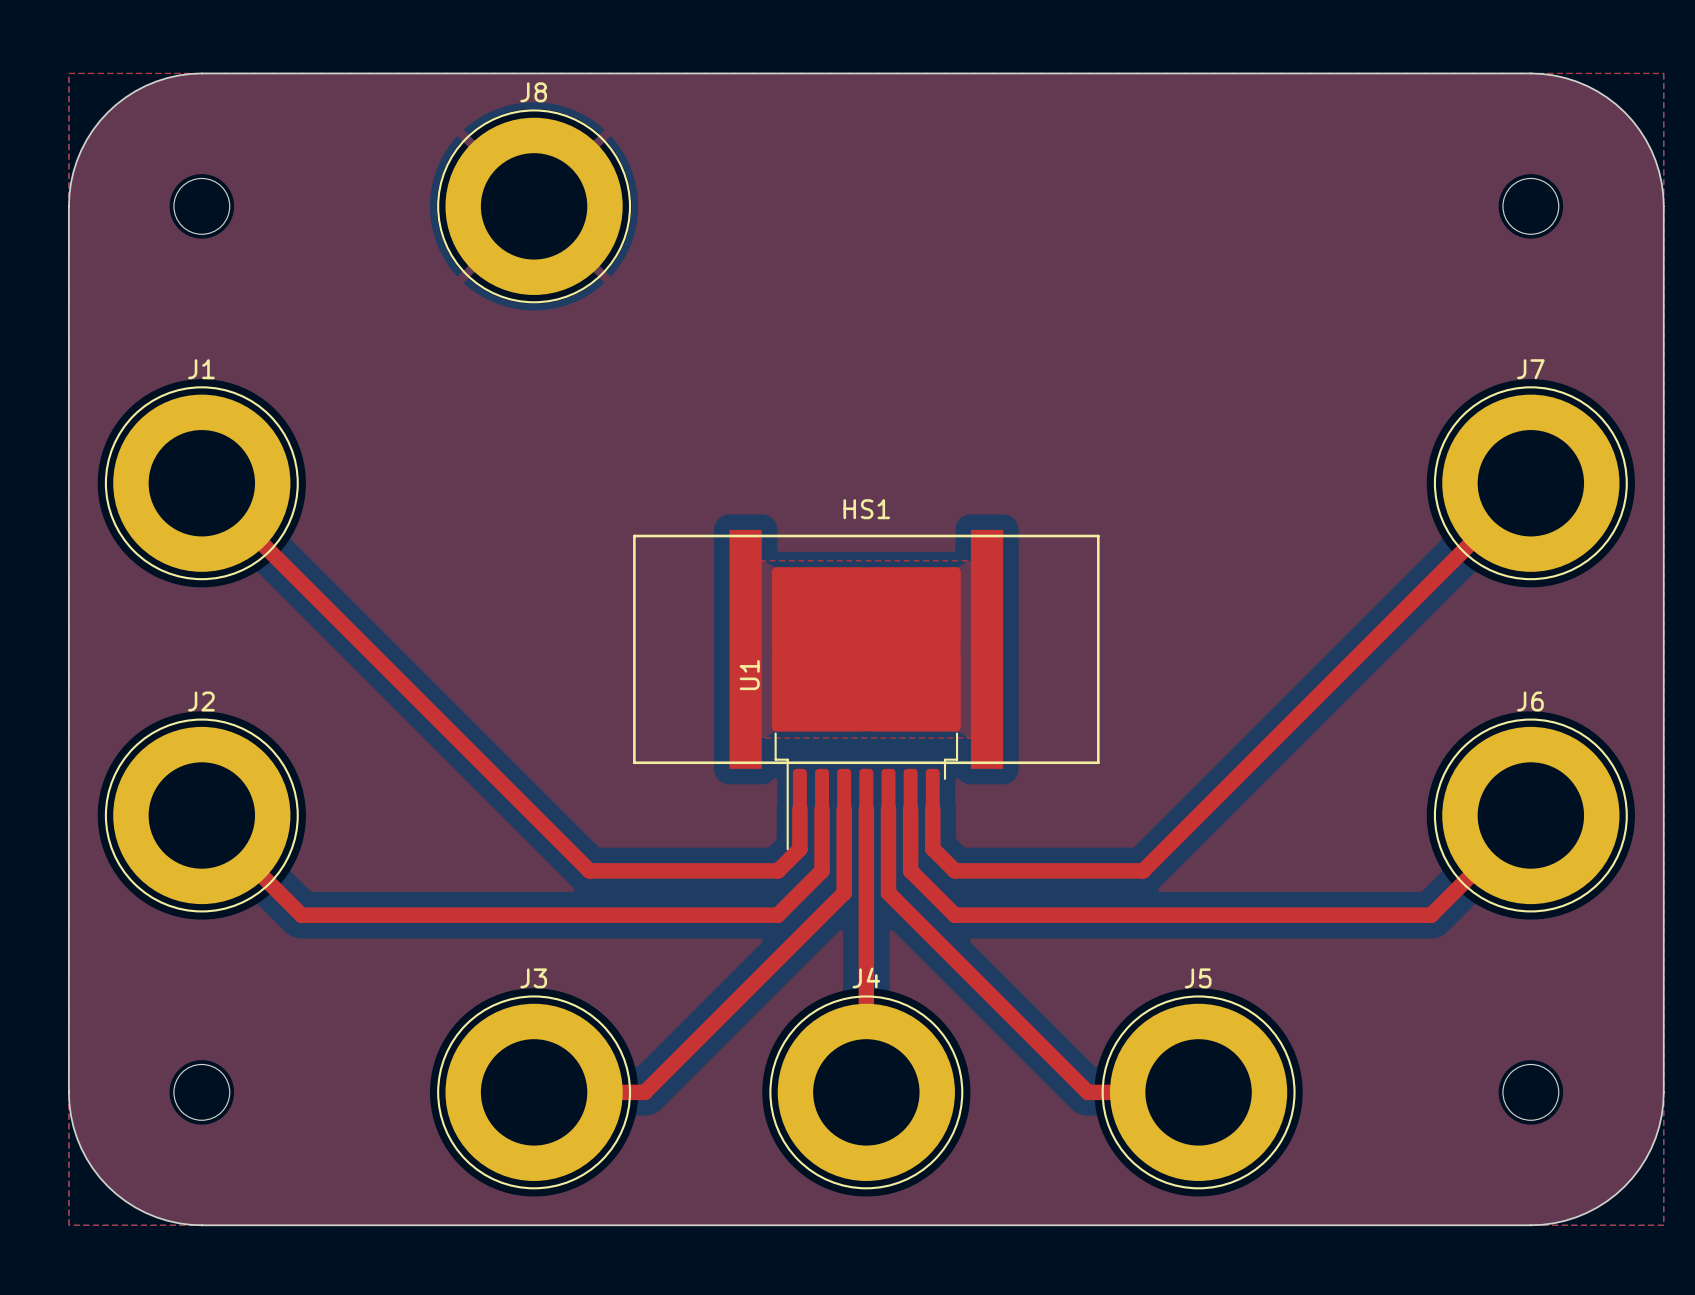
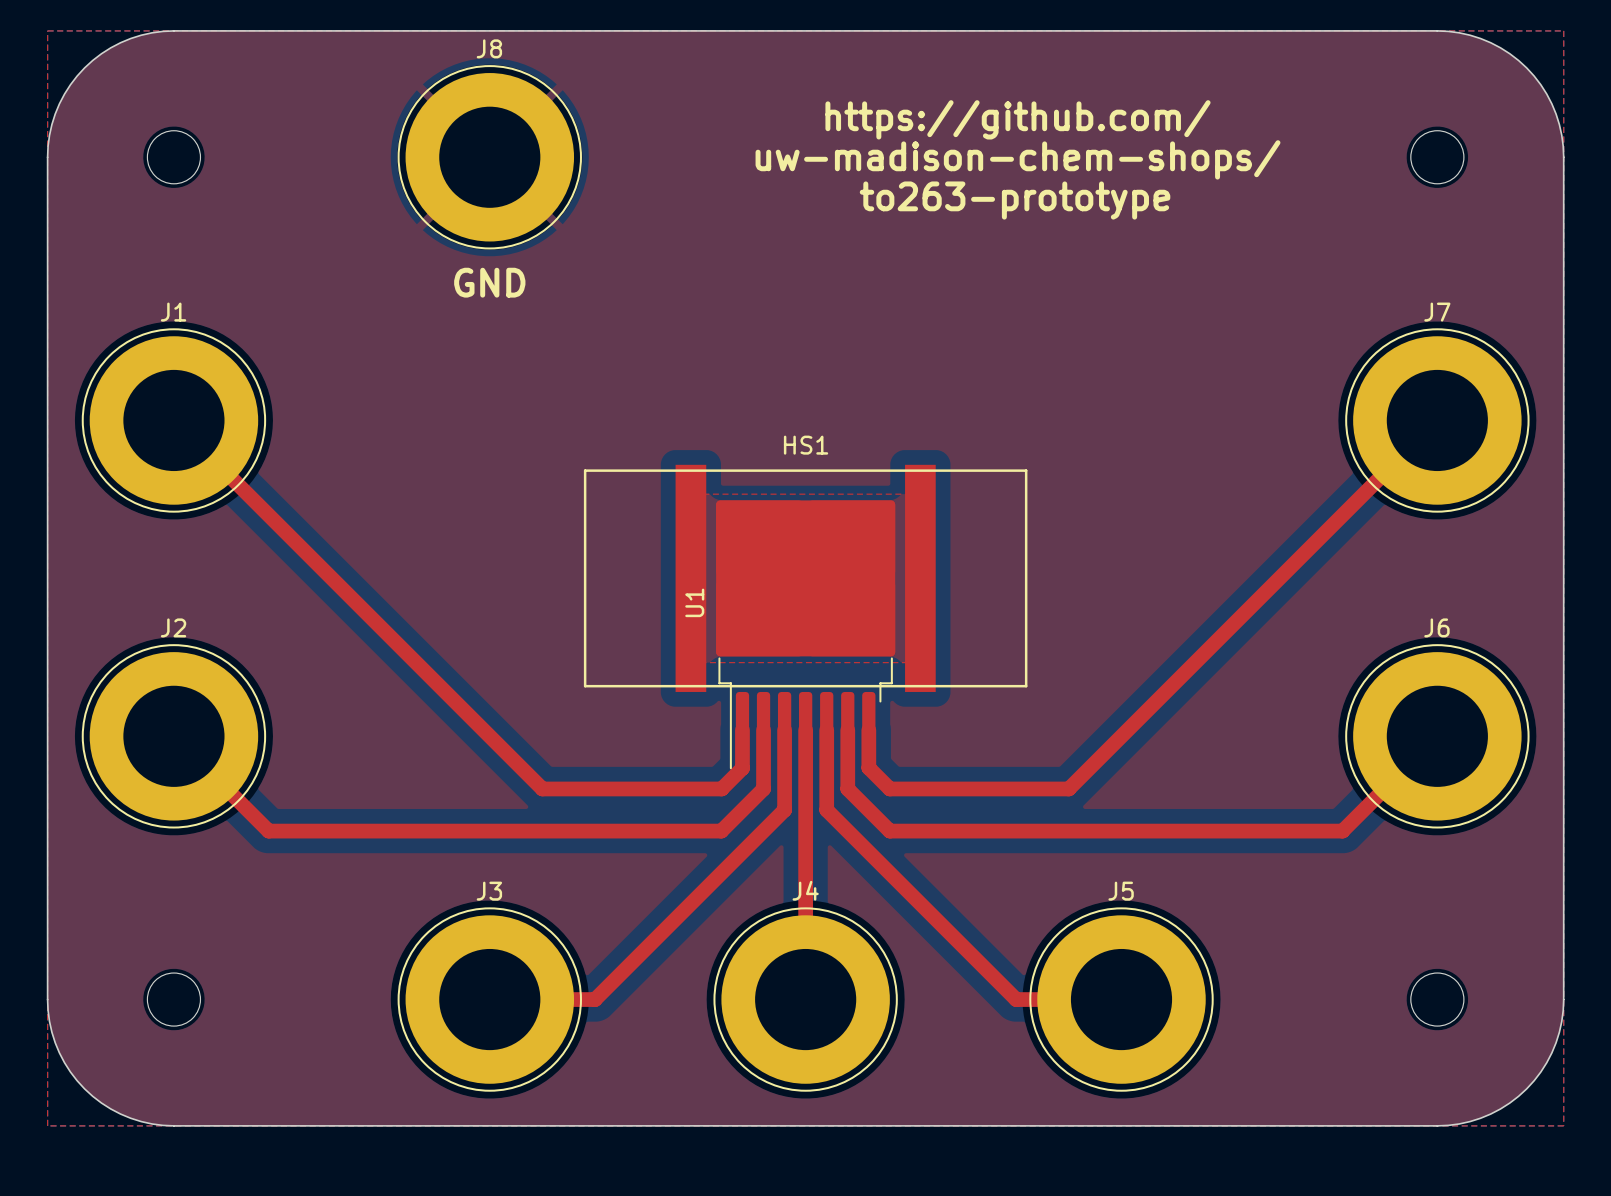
text: none -> https://github.com/ (1017, 119)
text: none -> uw-madison-chem-shops/ (1017, 159)
text: none -> to263-prototype (1015, 200)
text: none -> GND (489, 282)

